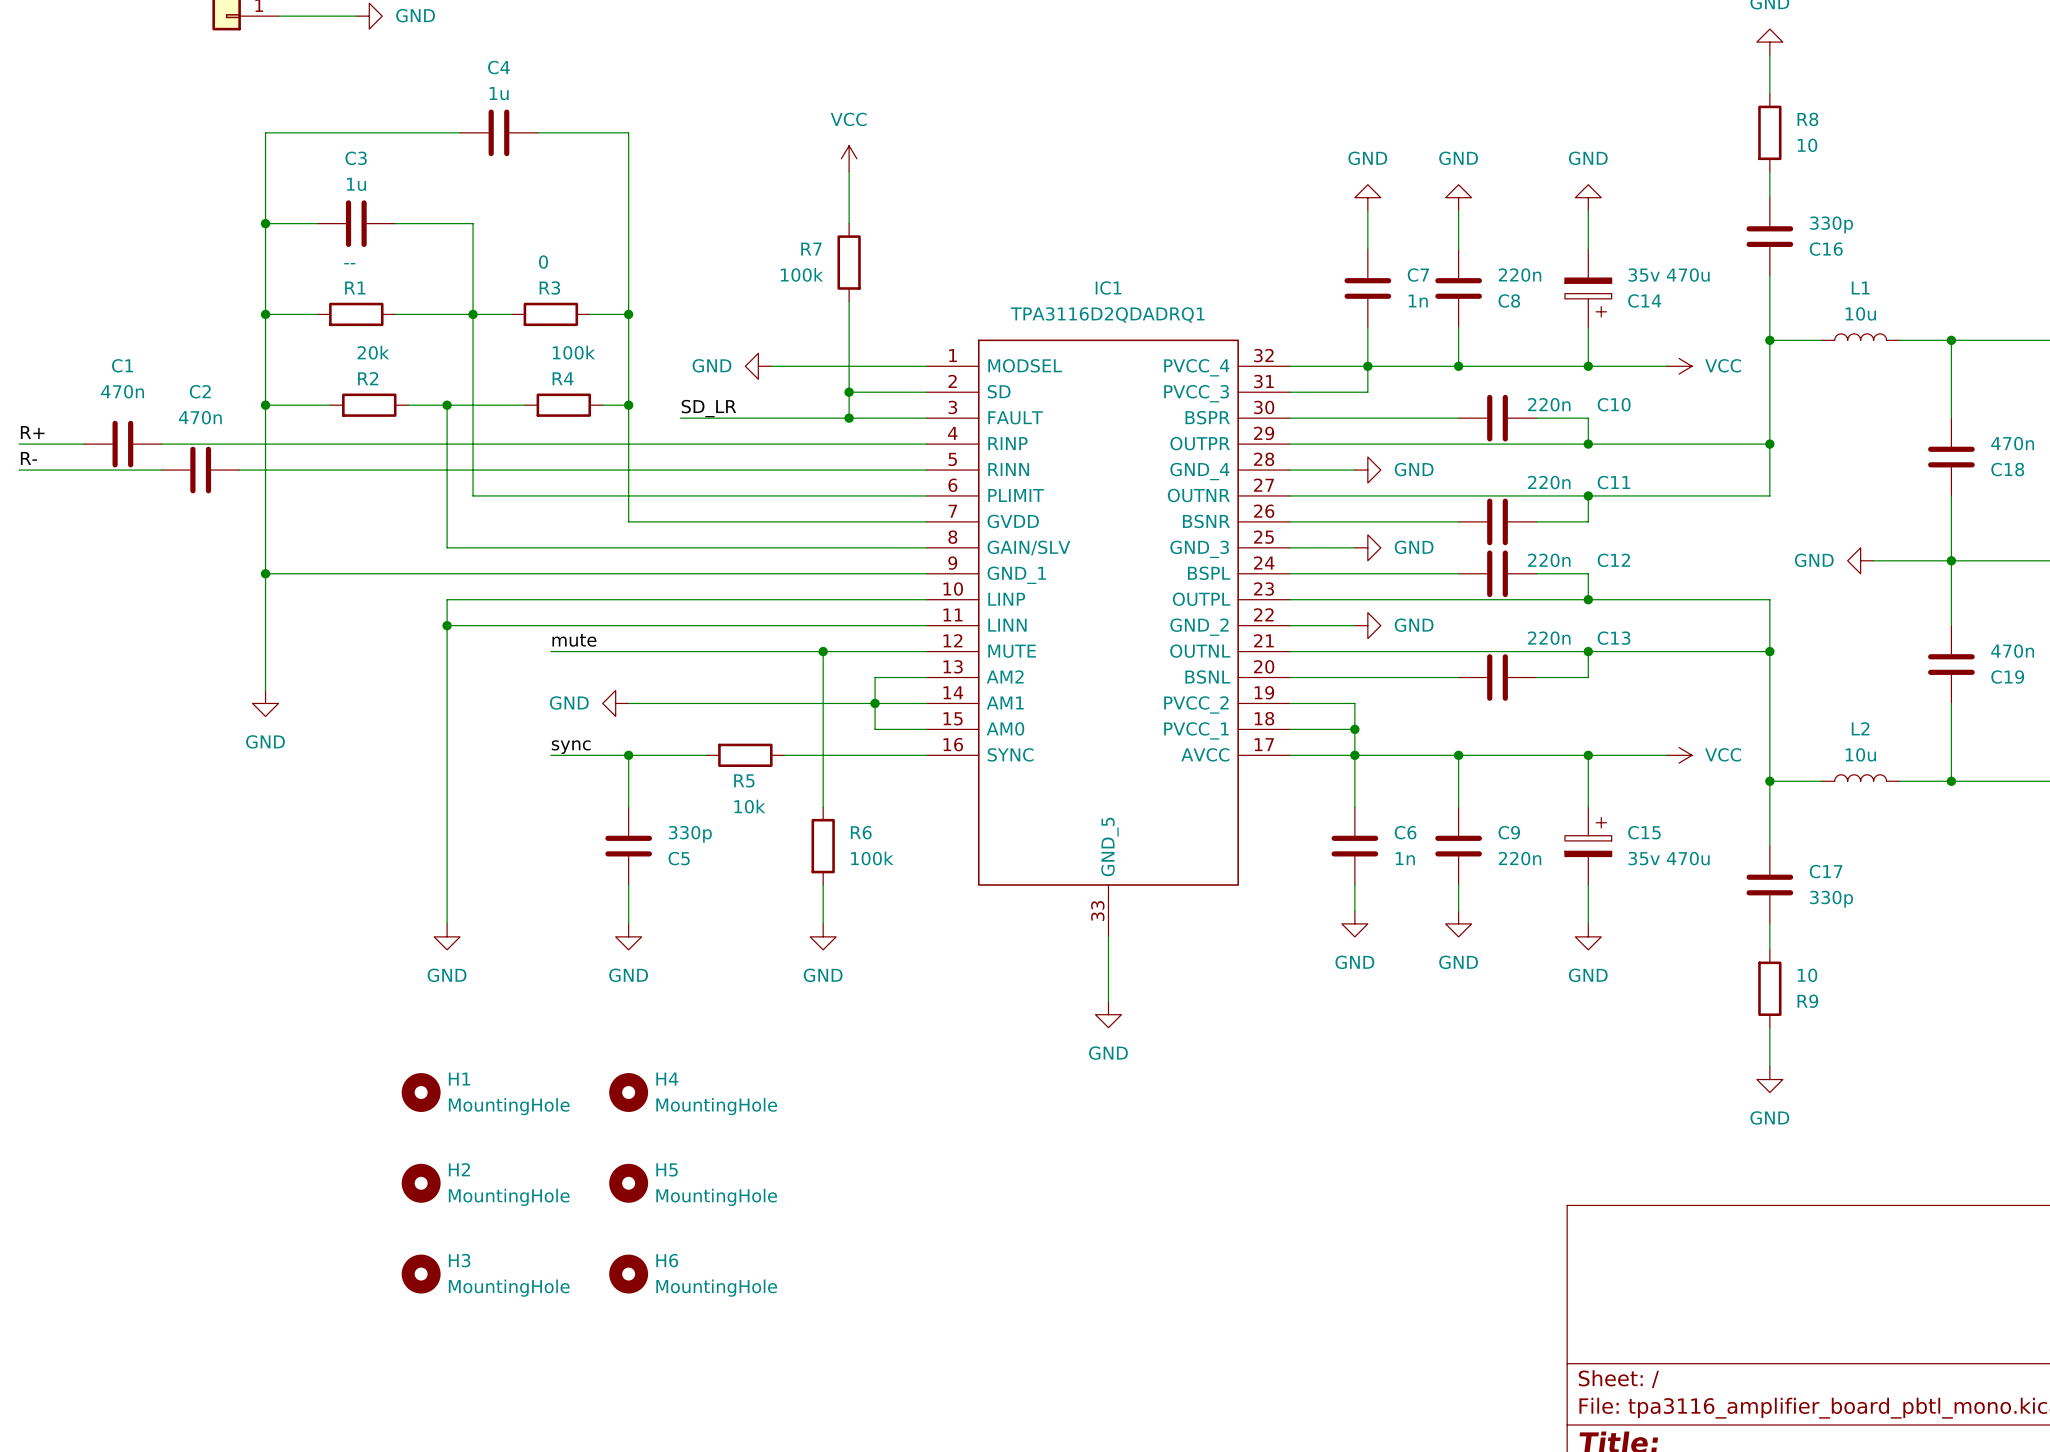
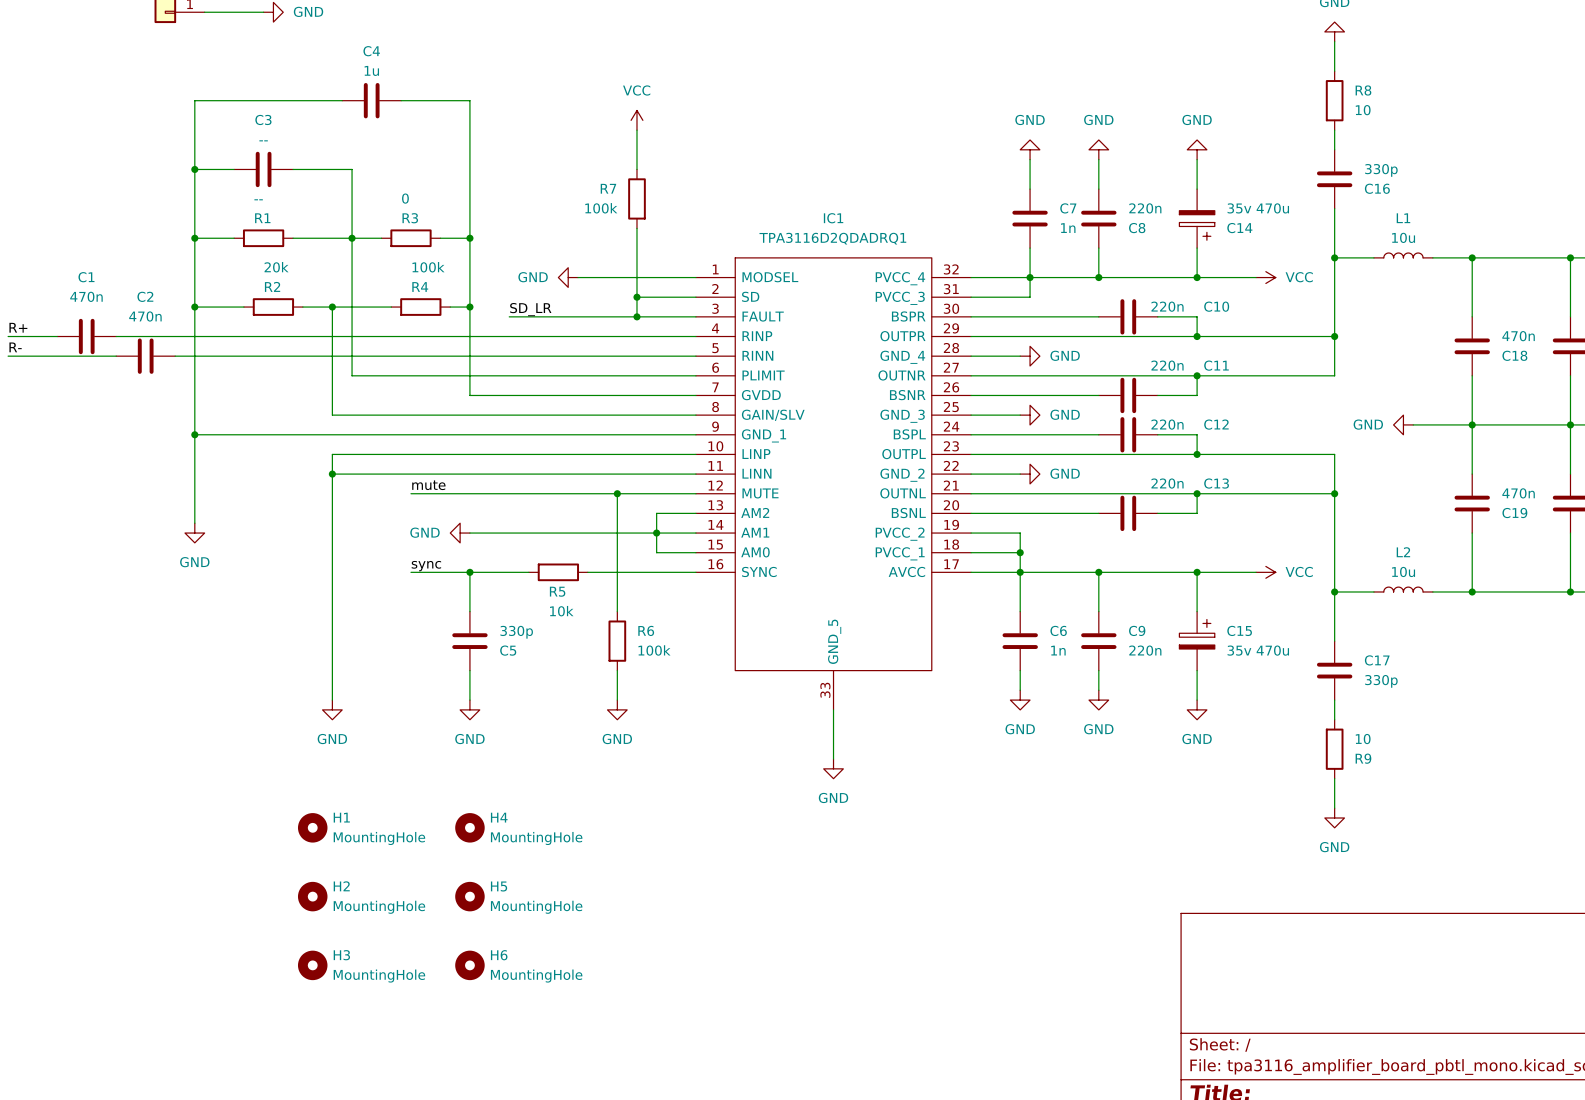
C3 value: 1u (356, 184) -> -- (263, 140)

